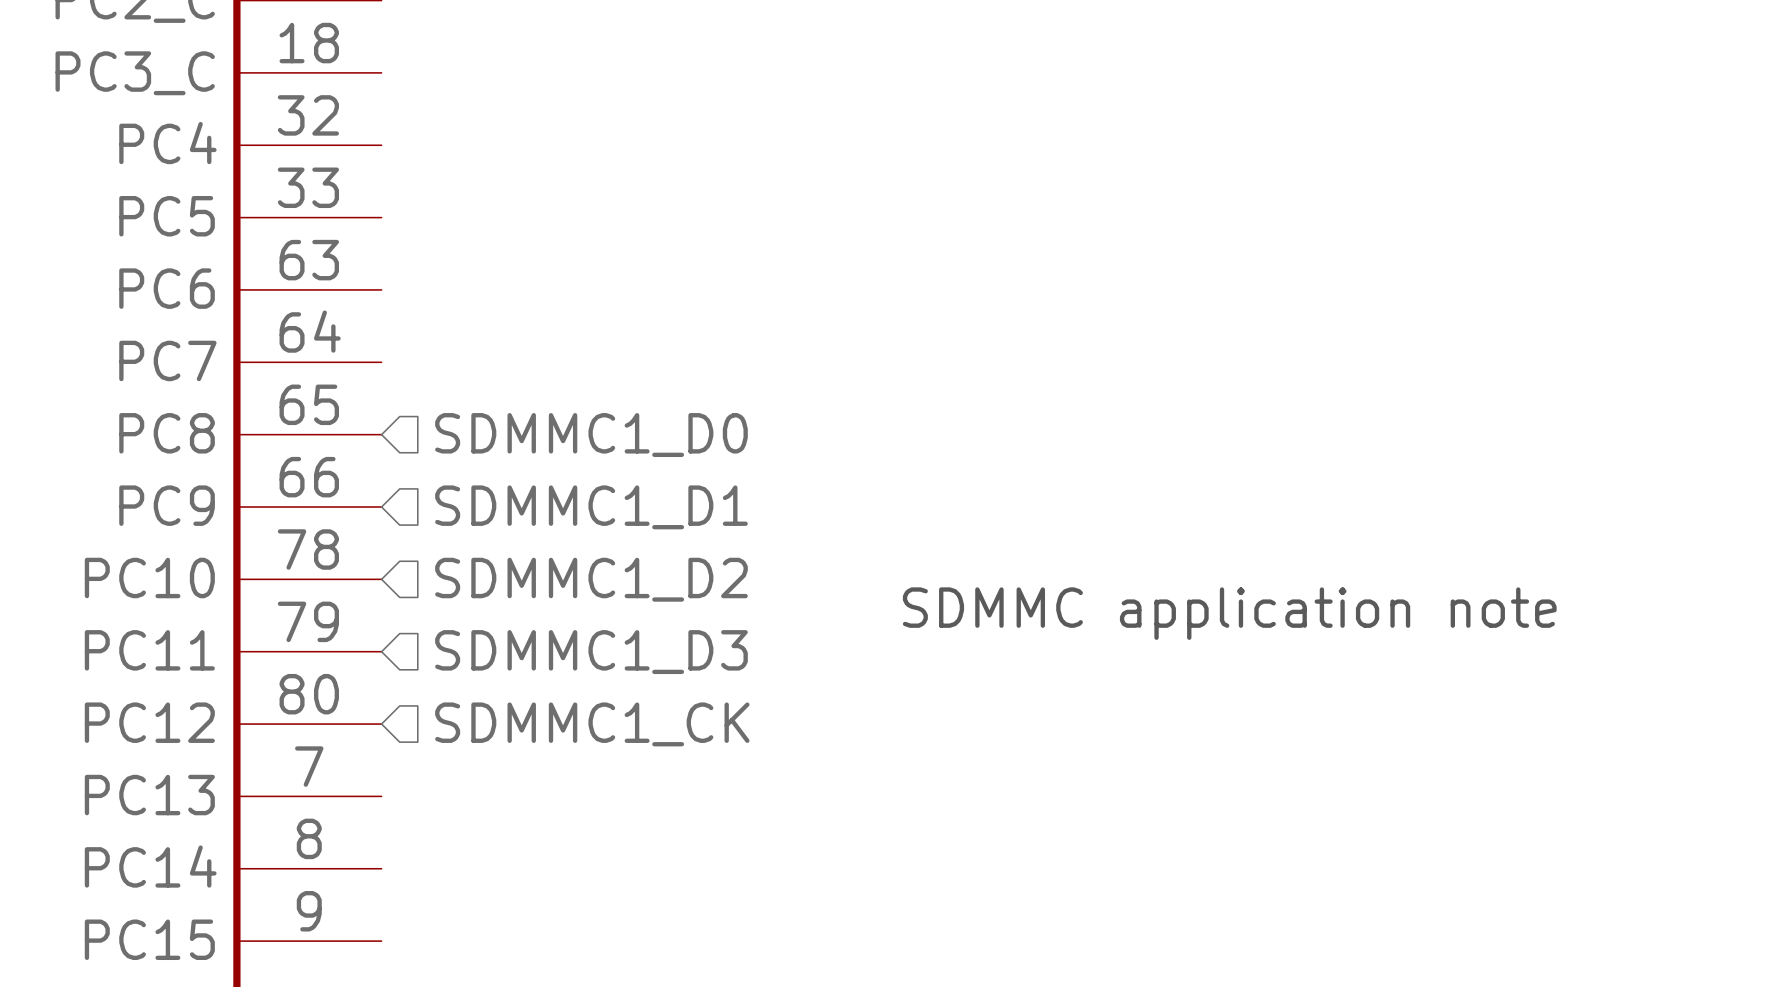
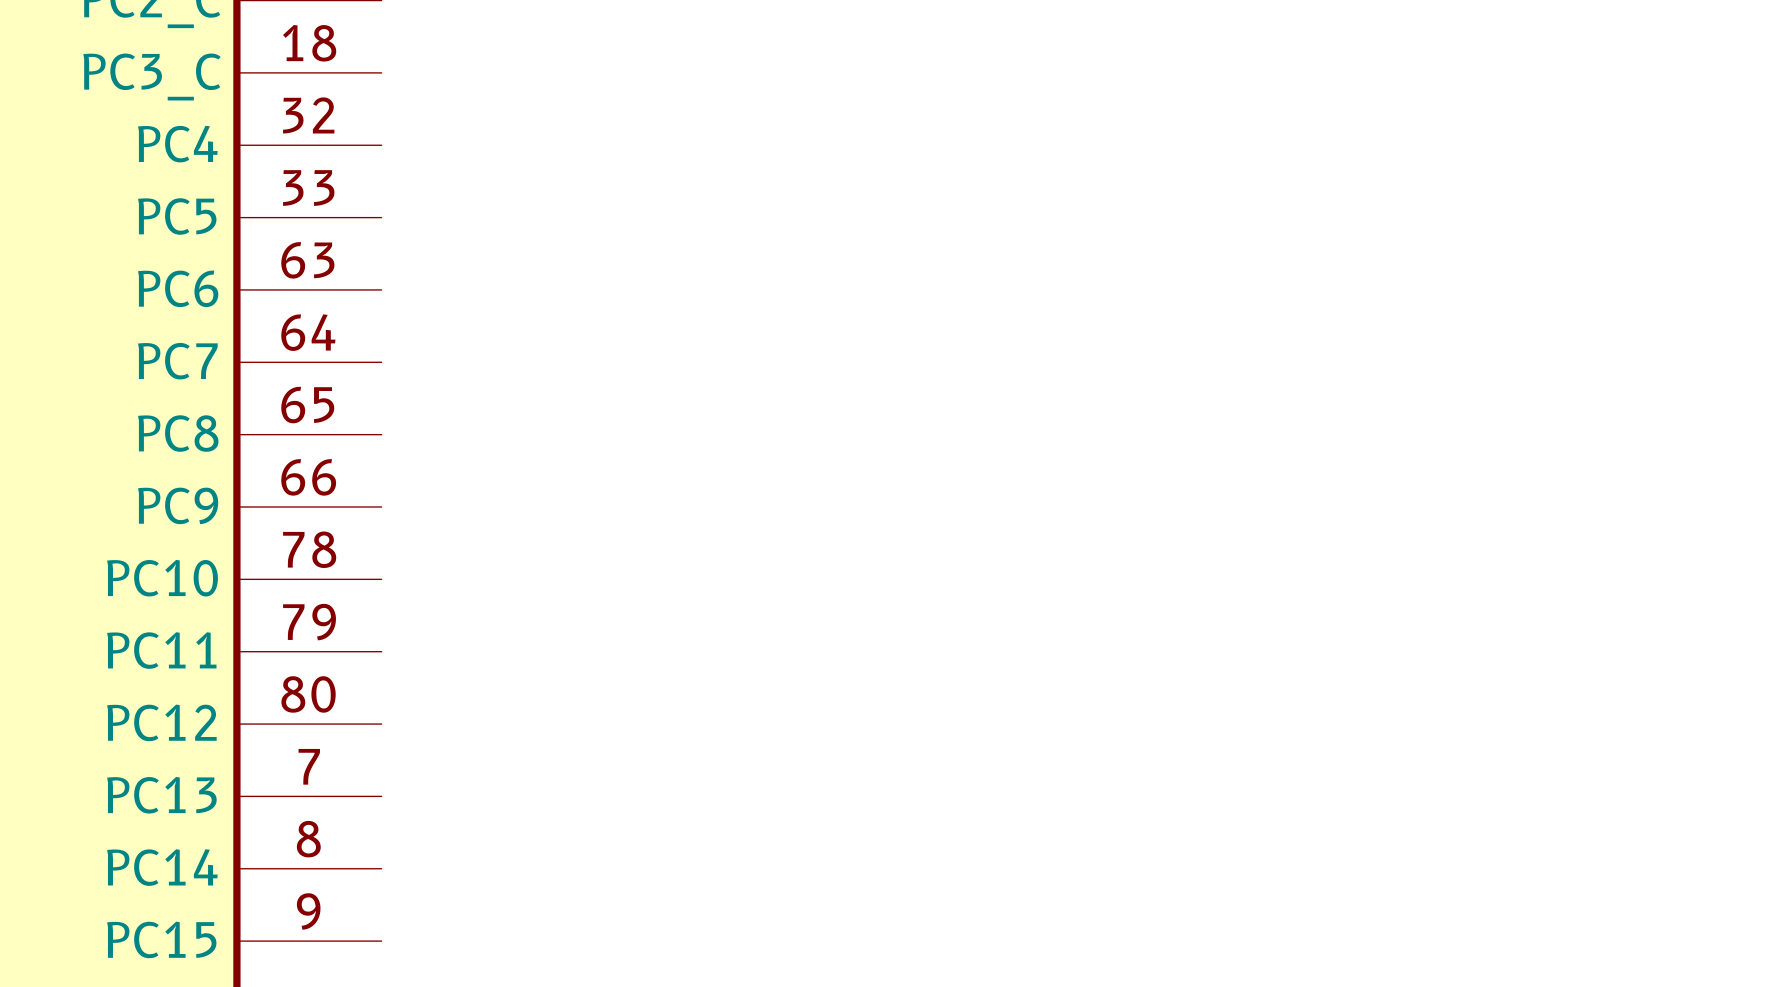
hierarchical label: SDMMC1_D0 (591, 435) -> none
hierarchical label: SDMMC1_D1 (591, 507) -> none
hierarchical label: SDMMC1_D2 (591, 579) -> none
text: SDMMC application note (1229, 613) -> none
hierarchical label: SDMMC1_D3 (591, 652) -> none
hierarchical label: SDMMC1_CK (592, 724) -> none

